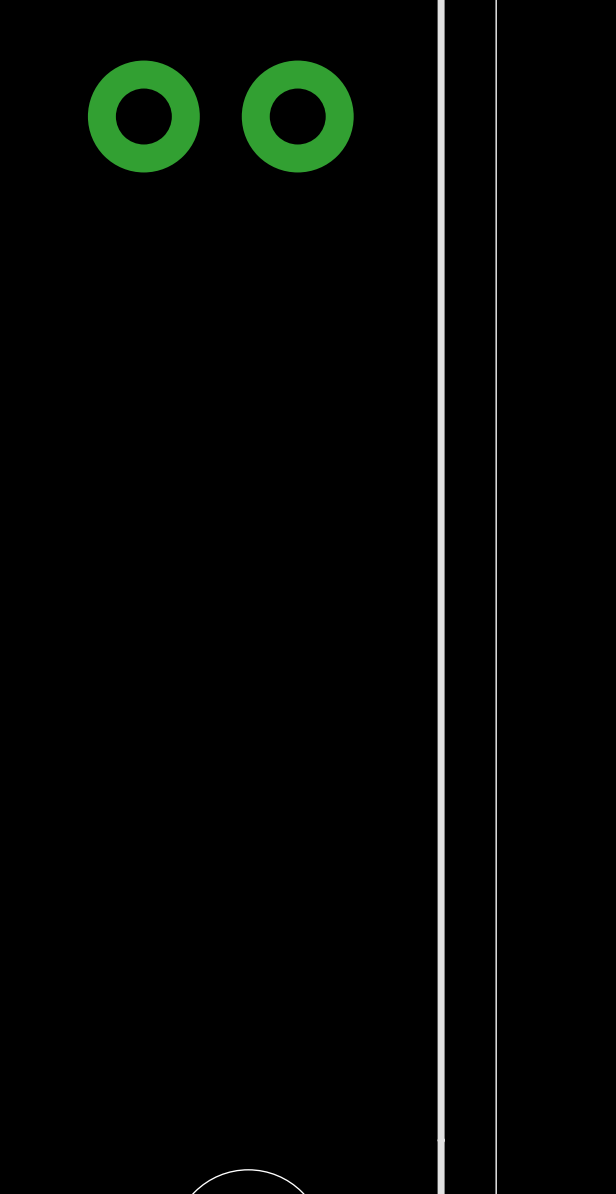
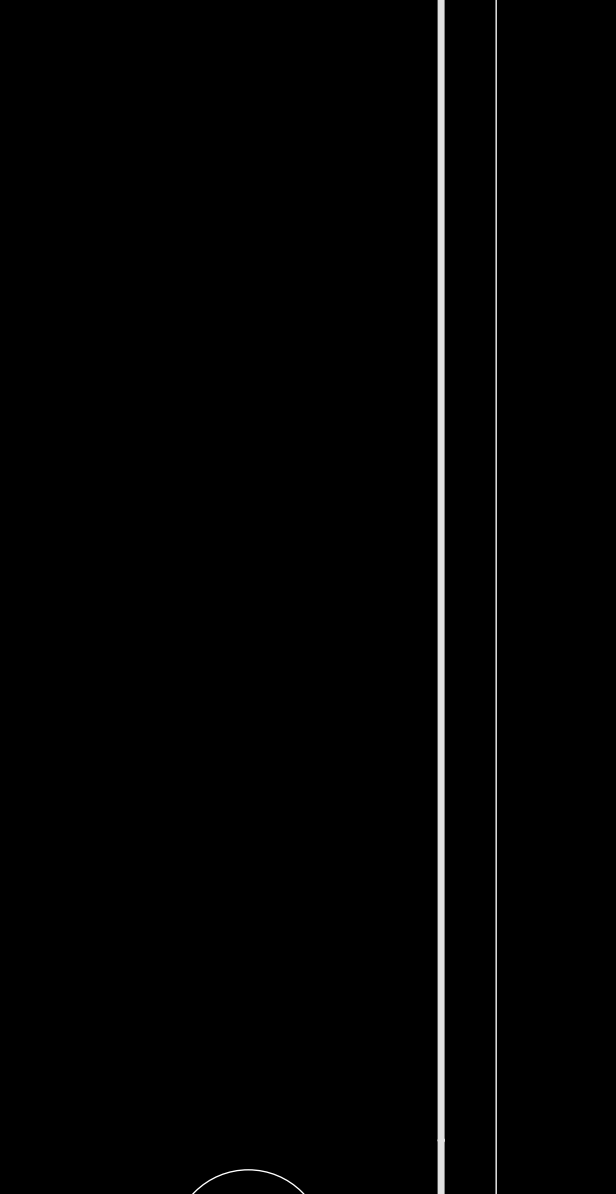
part: (220, 116) -> none

